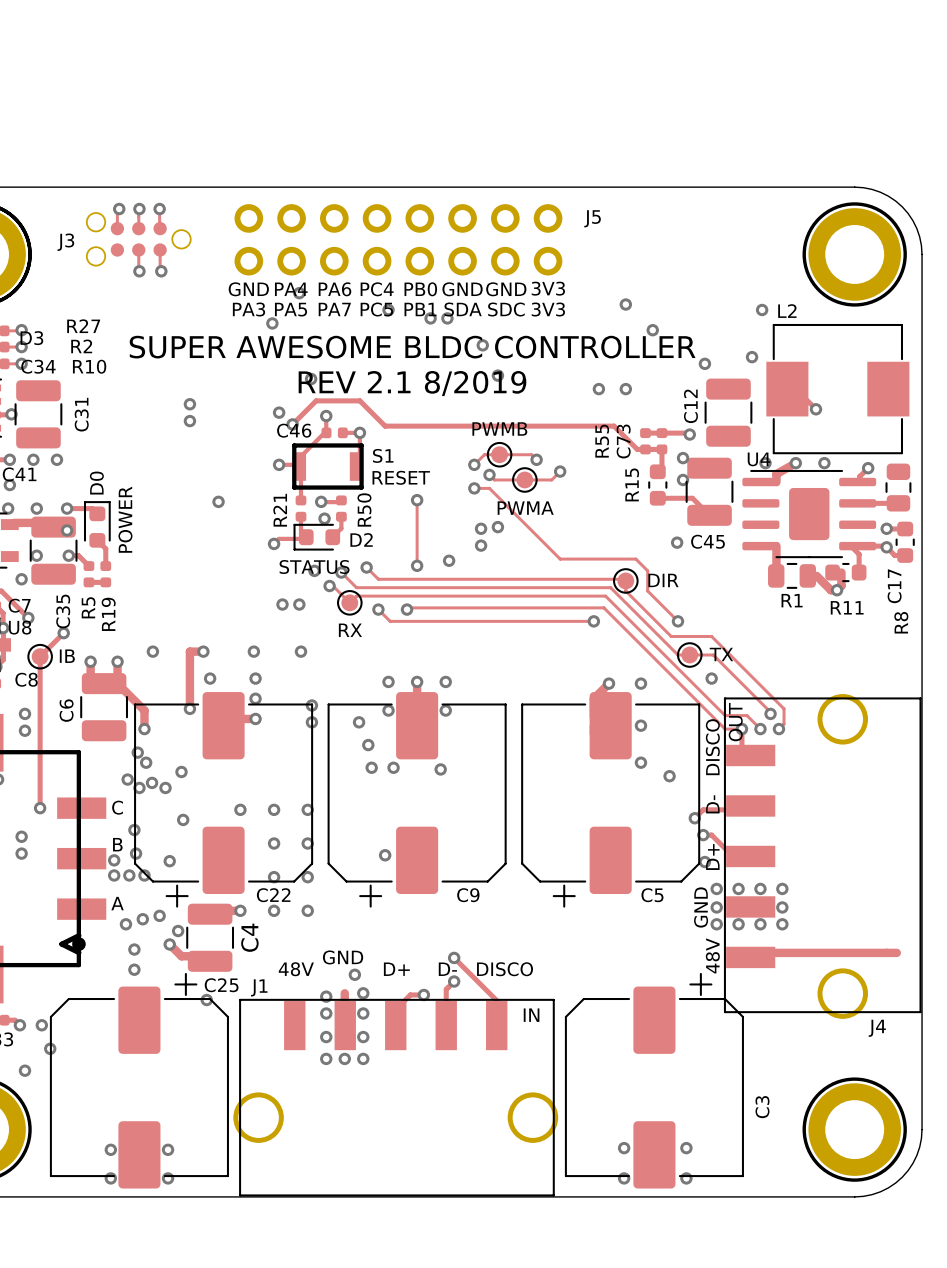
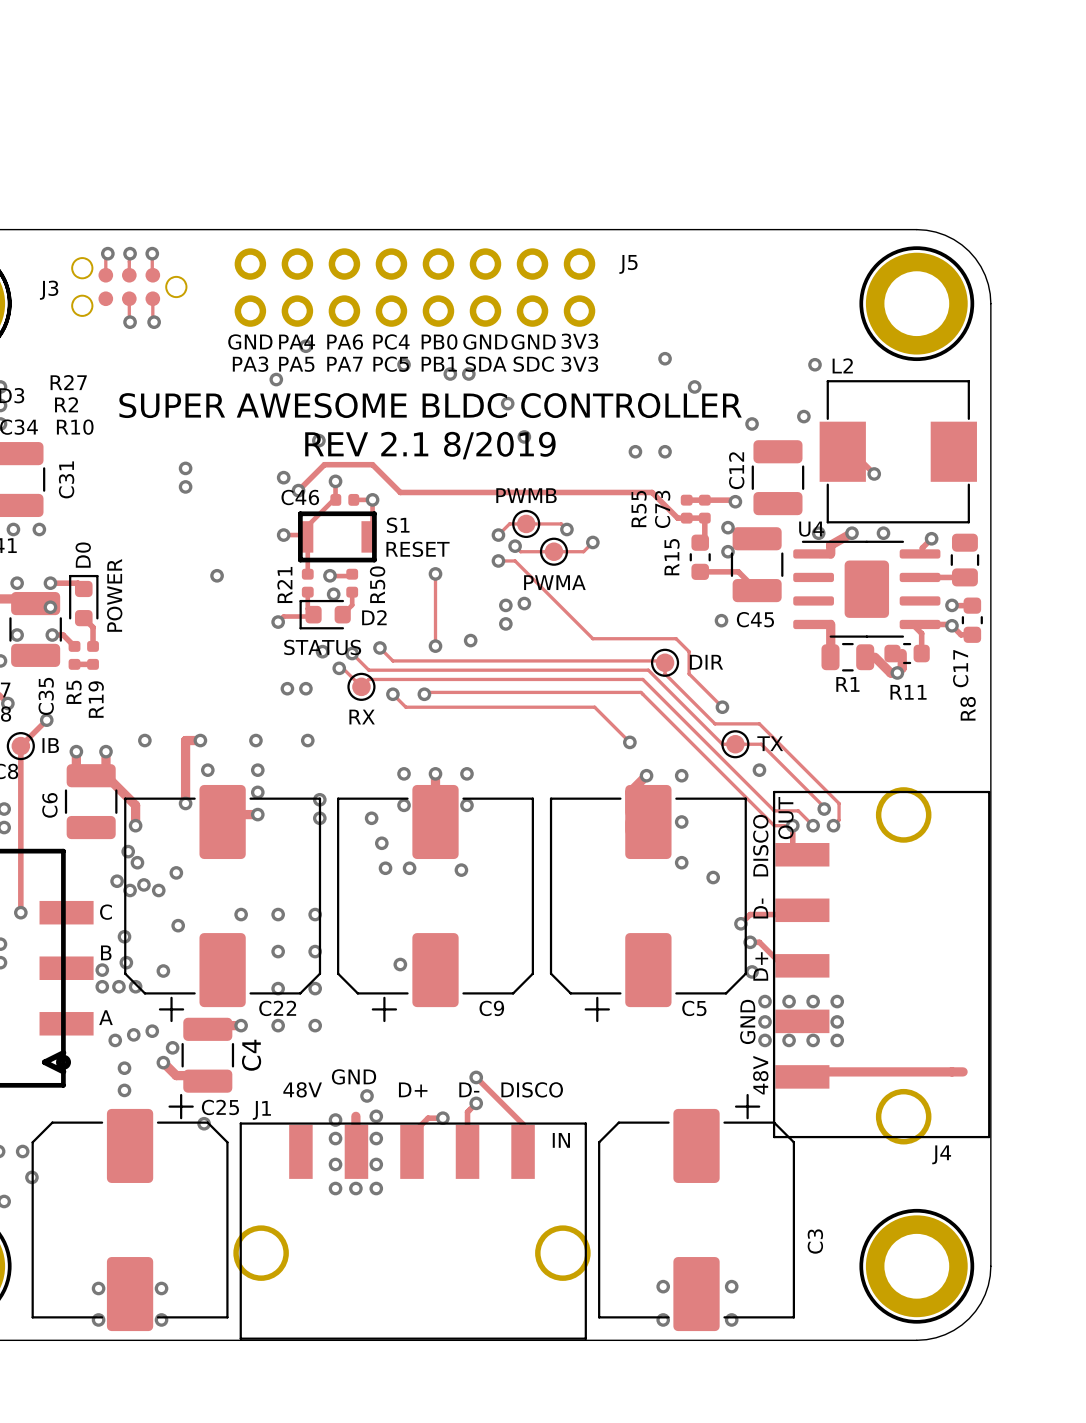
track: (561, 621) (593, 621) -> (594, 707) (629, 742)
via position: (593, 621) -> (629, 742)

